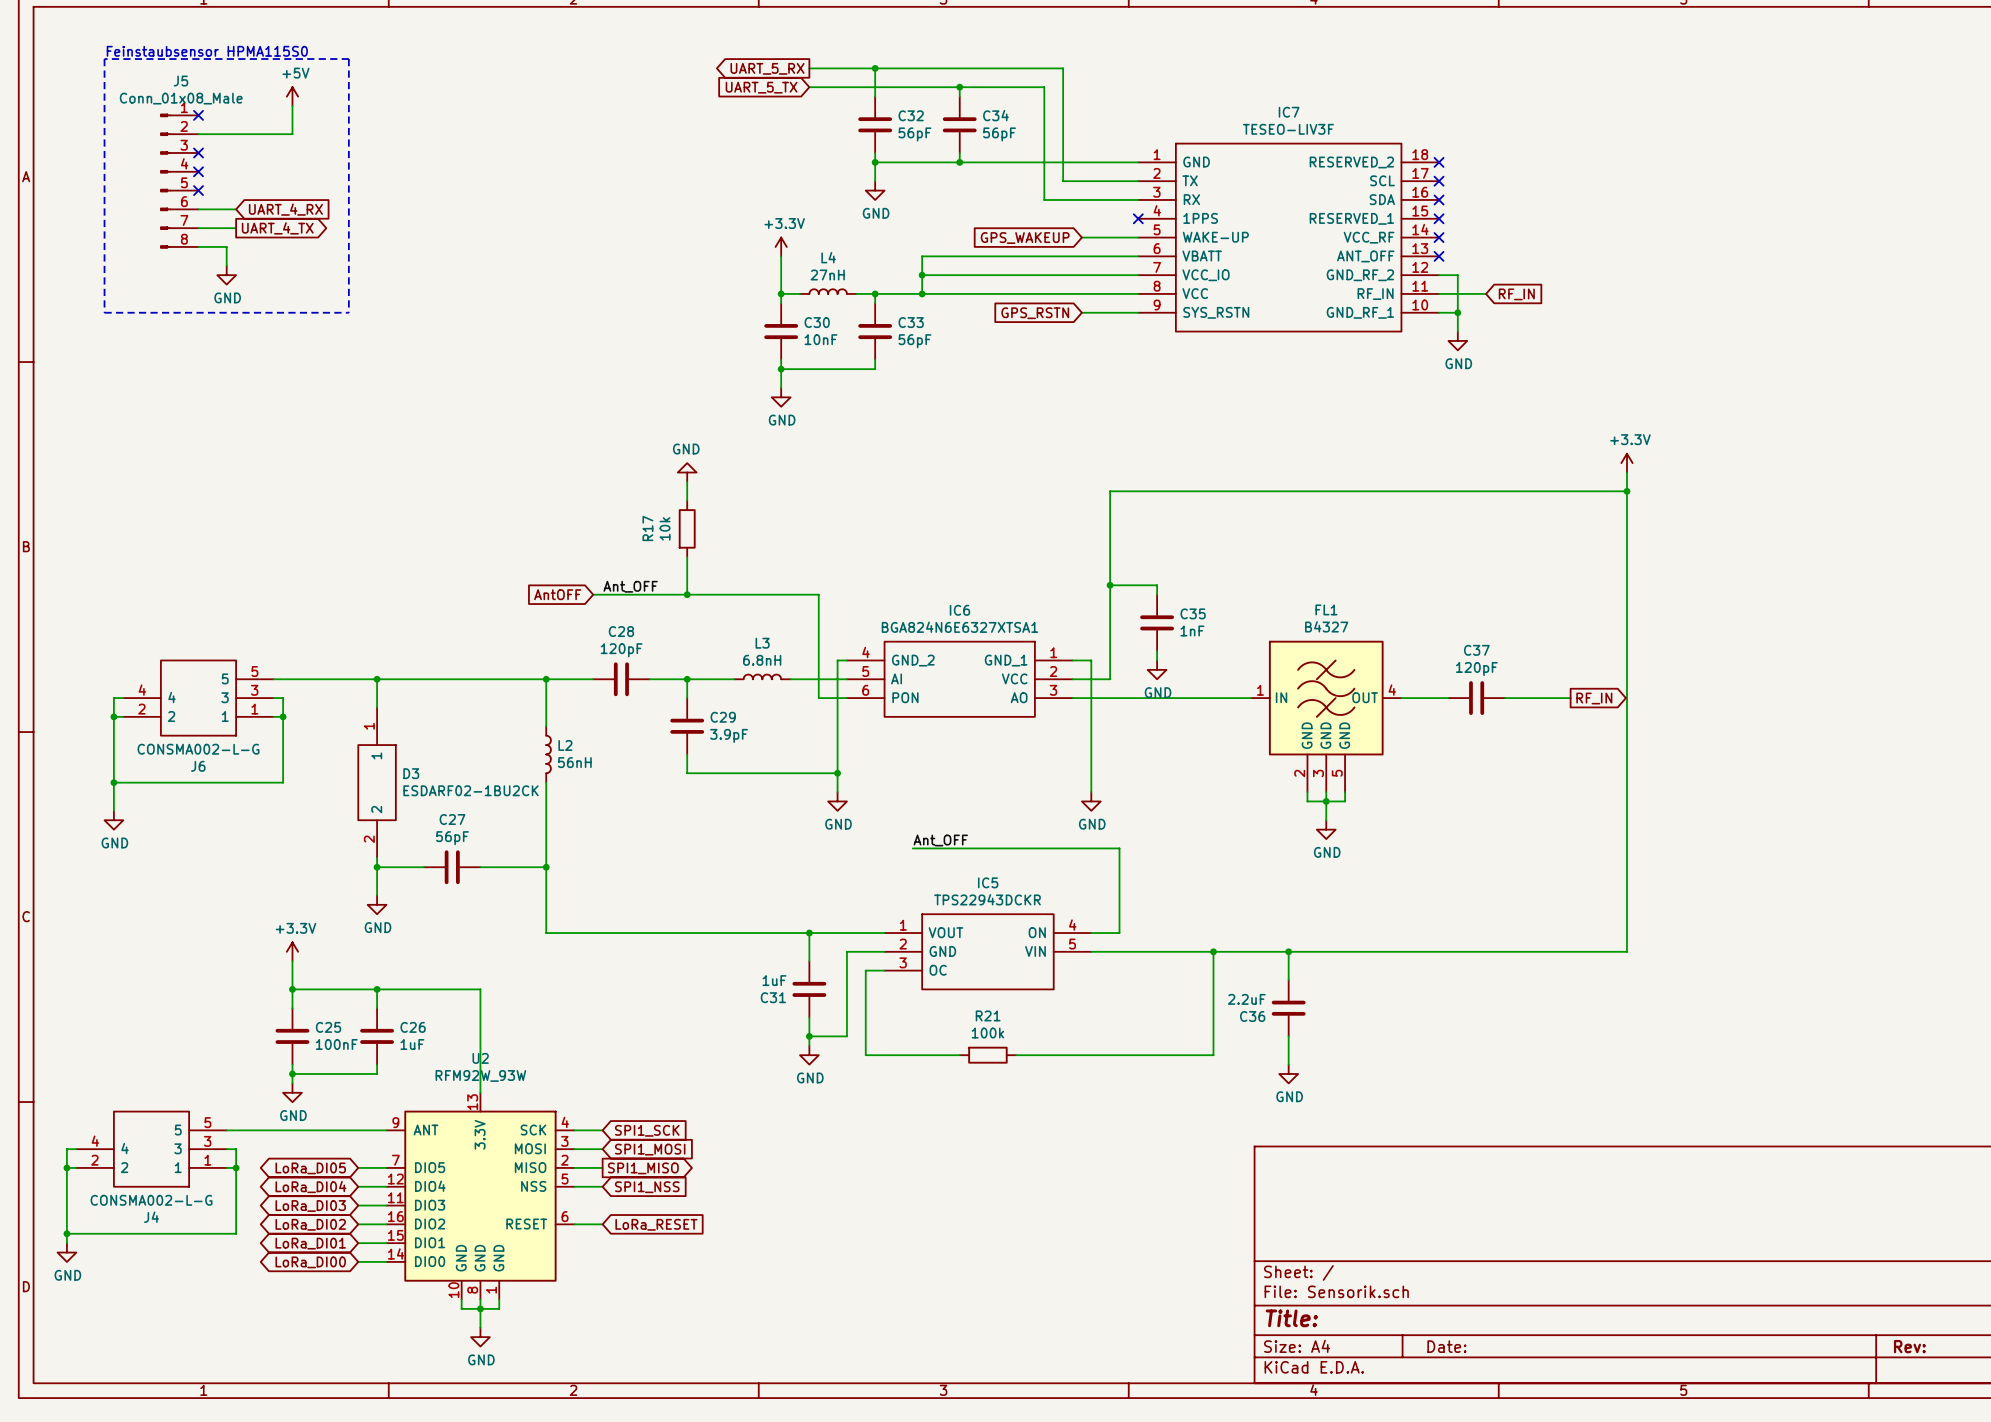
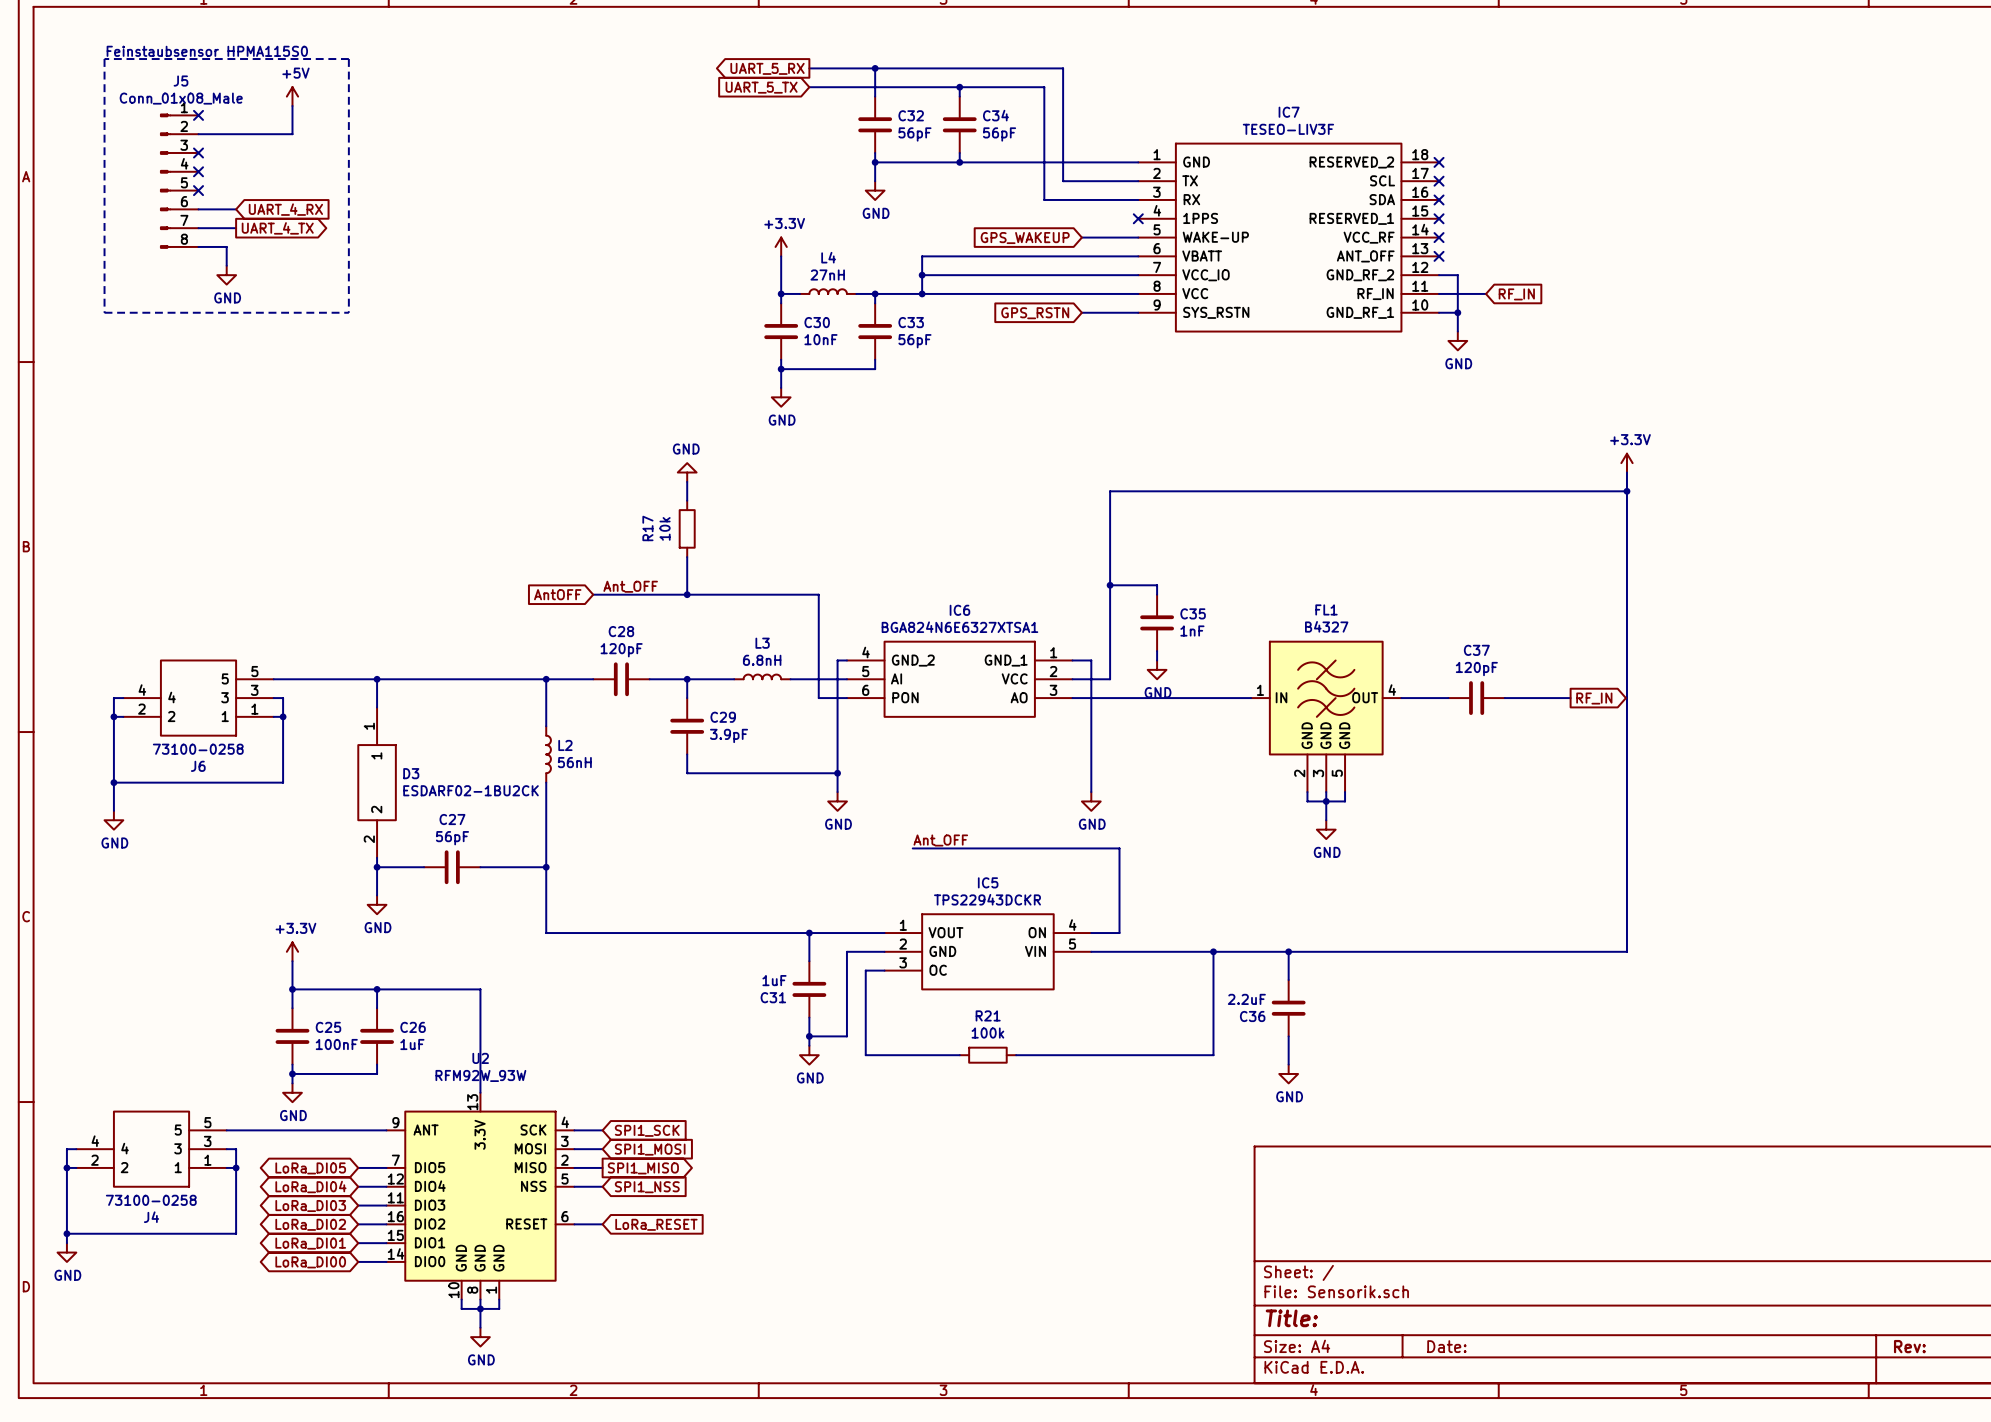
J6 value: CONSMA002-L-G (198, 749) -> 73100-0258 (198, 749)
J4 value: CONSMA002-L-G (151, 1200) -> 73100-0258 (151, 1200)

